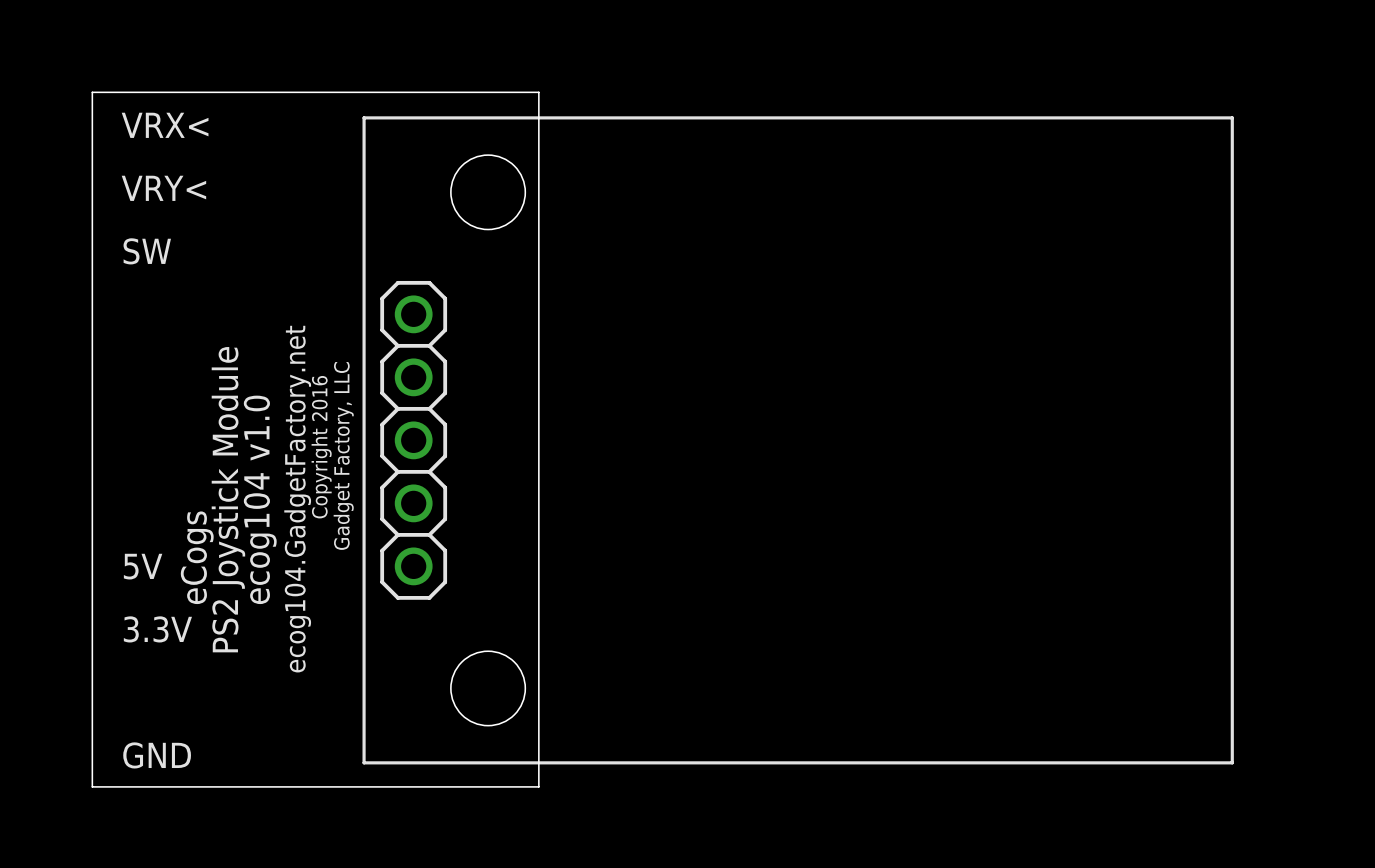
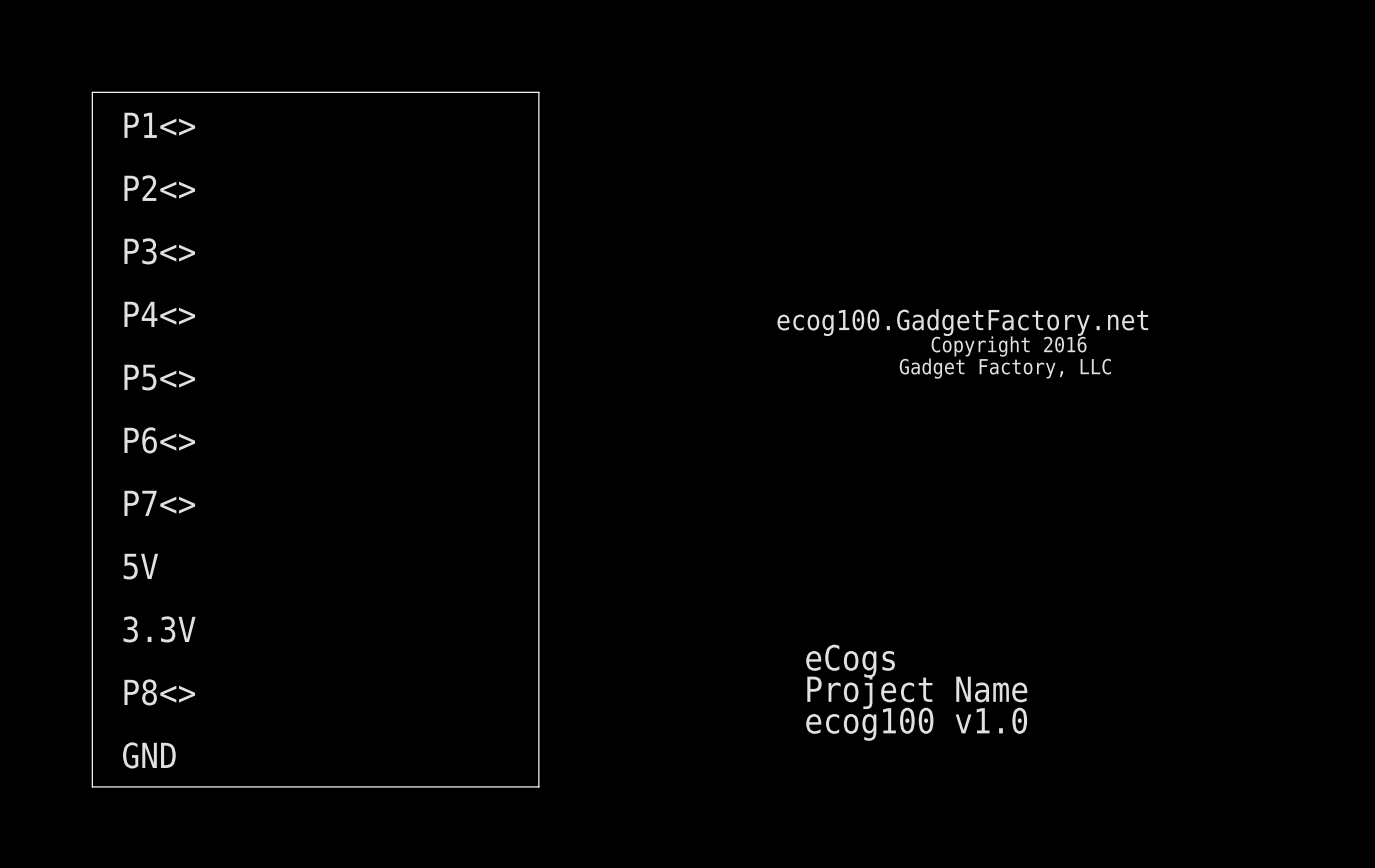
text: VRX< (165, 125) -> P1<> (159, 125)
text: VRY< (163, 188) -> P2<> (159, 188)
text: SW (147, 251) -> P3<> (159, 251)
text: none -> P4<> (159, 314)
text: none -> ecog100.GadgetFactory.net (962, 322)
text: none -> Copyright 2016 (1009, 346)
text: none -> P5<> (159, 377)
text: none -> P6<> (159, 440)
part: (798, 440) -> none
text: Copyright 2016 (321, 447) -> none
text rotation: 0° (343, 455) -> 90° clockwise (1005, 368)
text position: Gadget Factory, LLC (343, 455) -> Gadget Factory, LLC (1005, 368)
text: PS2 Joystick Module (228, 499) -> none
text: ecog104 v1.0 (260, 499) -> none
text: ecog104.GadgetFactory.net (297, 499) -> none
text: none -> P7<> (159, 503)
text rotation: 0° (197, 557) -> 90° clockwise (850, 661)
text position: eCogs (197, 557) -> eCogs (850, 661)
text: none -> P8<> (159, 692)
text: none -> Project Name (917, 692)
text: none -> ecog100 v1.0 (916, 724)

